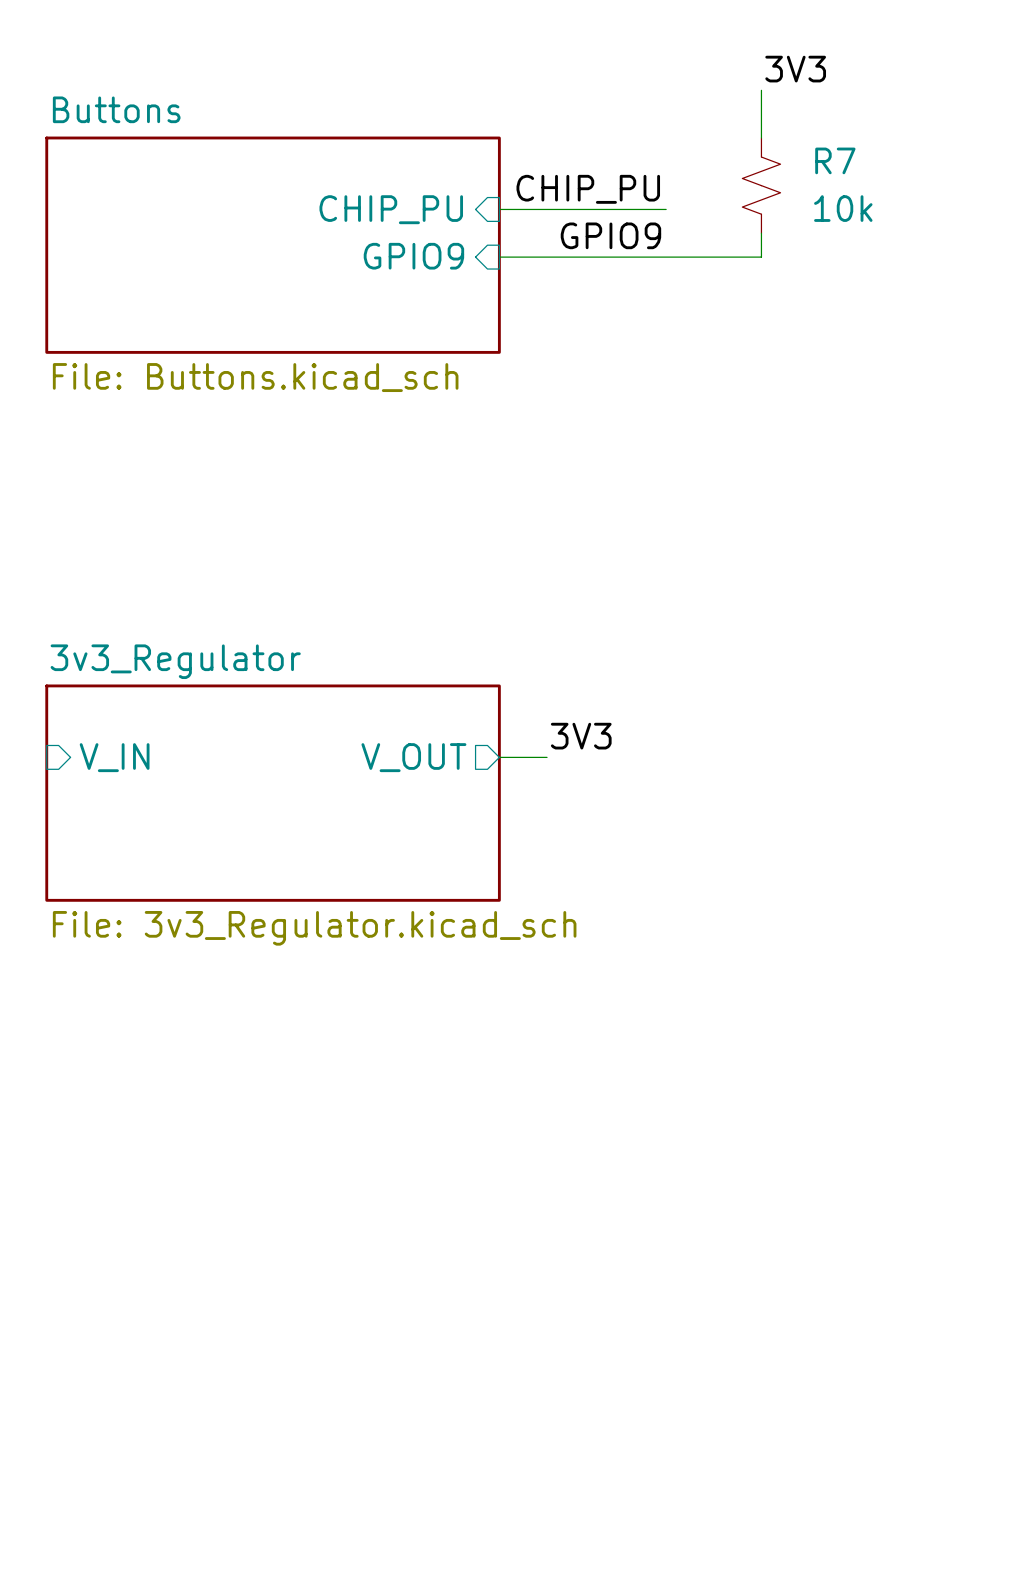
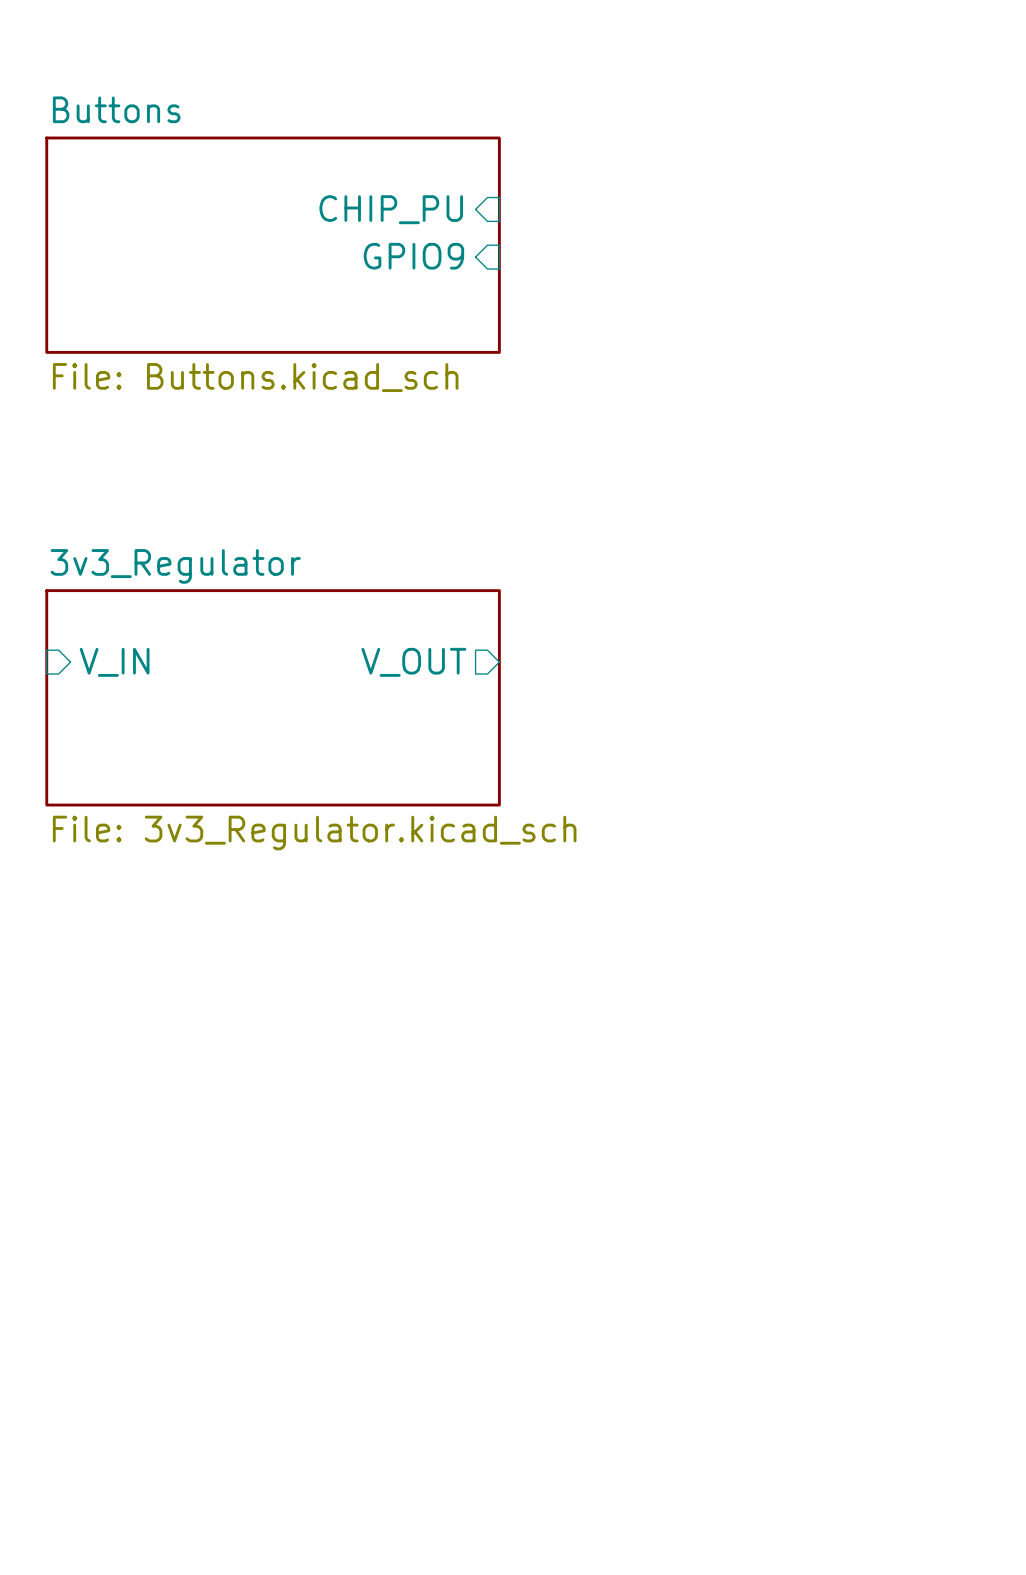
label: 3V3 (795, 69) -> none
wire: (761, 90) (761, 137) -> none
R7: 10k (761, 185) -> none
label: CHIP_PU (588, 189) -> none
wire: (499, 209) (666, 209) -> none
wire: (761, 233) (761, 257) (499, 257) -> none
label: GPIO9 (610, 235) -> none
label: 3V3 (581, 736) -> none
sheet pin position: V_IN (114, 757) -> V_IN (114, 662)
sheet pin position: V_OUT (413, 757) -> V_OUT (413, 662)
wire: (499, 757) (547, 757) -> none
sheet 3v3_Regulator position: (273, 793) -> (273, 697)

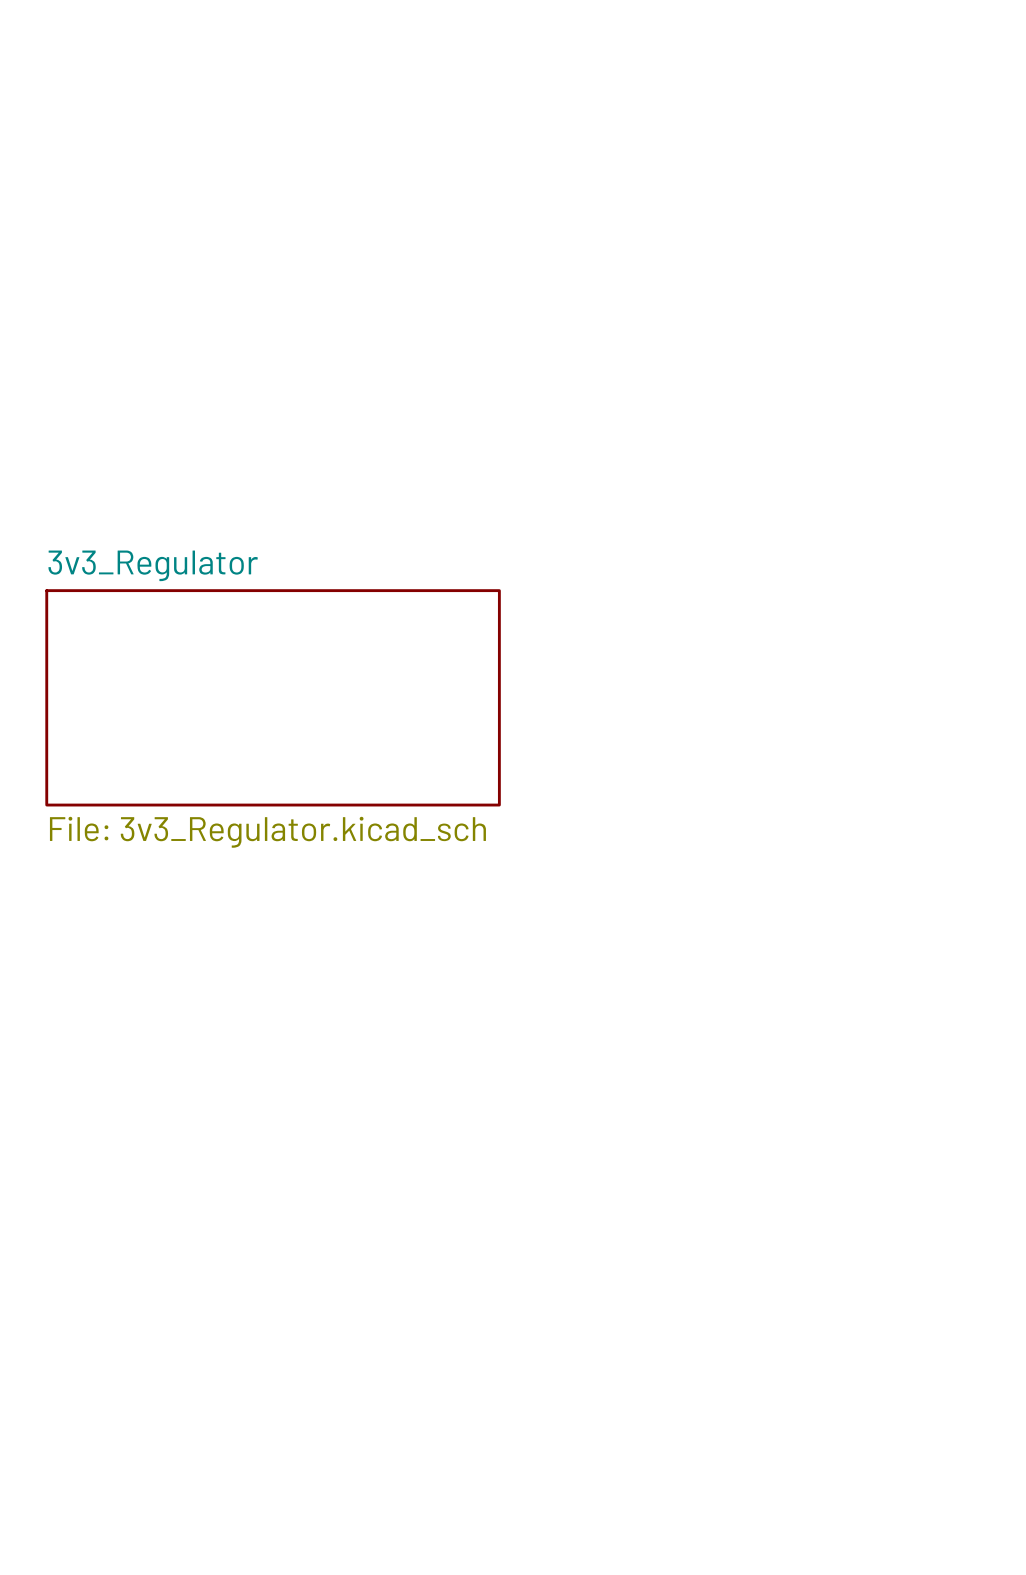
sheet pin: CHIP_PU (391, 209) -> none
sheet Buttons: File: Buttons.kicad_sch (273, 245) -> none
sheet pin: GPIO9 (413, 256) -> none
sheet pin: V_IN (114, 662) -> none
sheet pin: V_OUT (413, 662) -> none

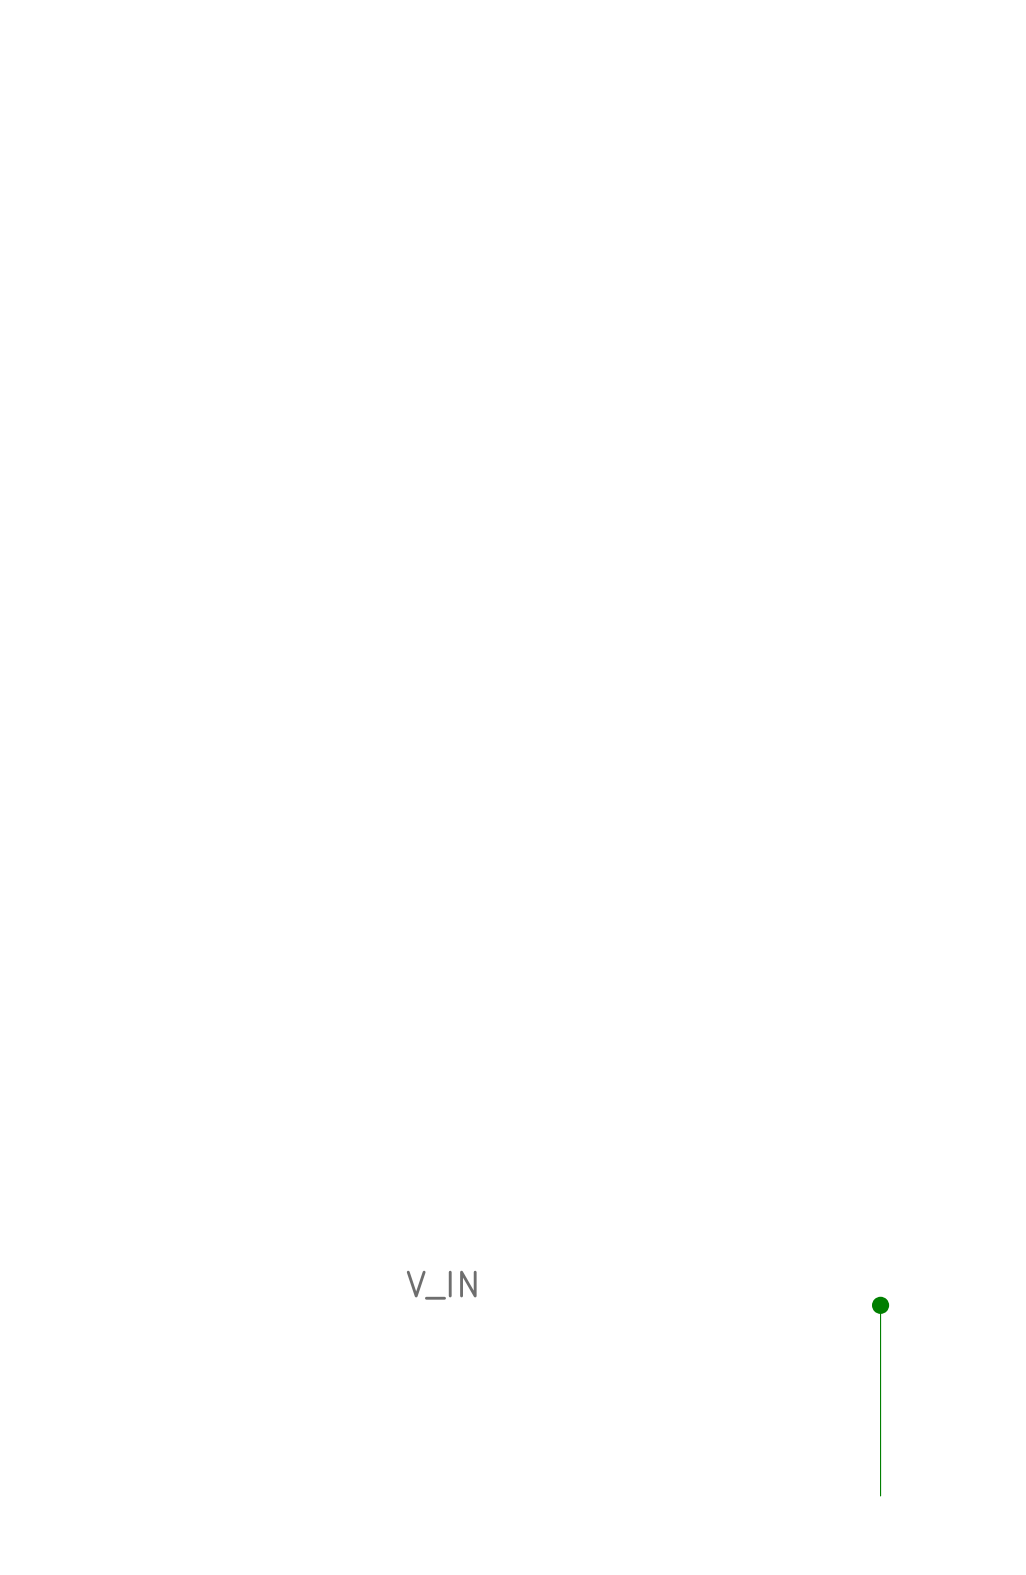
sheet 3v3_Regulator: File: 3v3_Regulator.kicad_sch (273, 697) -> none
label: none -> V_IN (441, 1285)
wire: none -> (880, 1305) (880, 1495)
junction: none -> (880, 1305)

